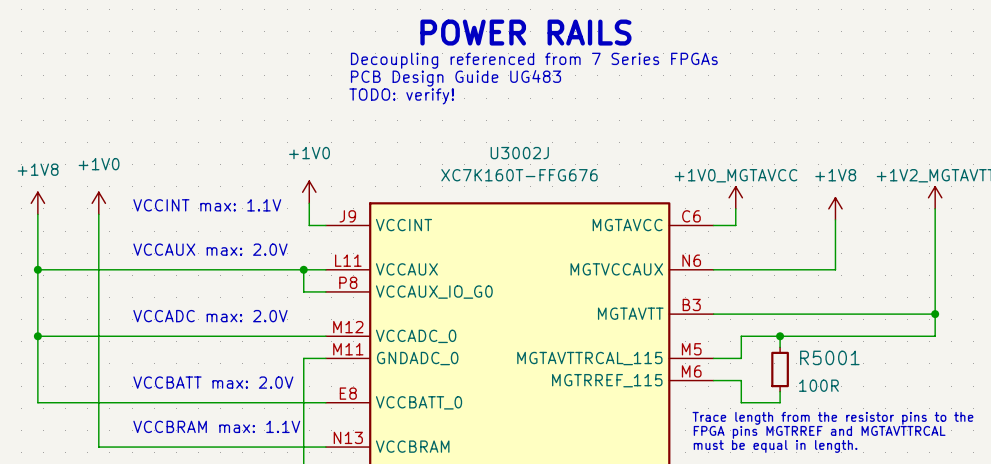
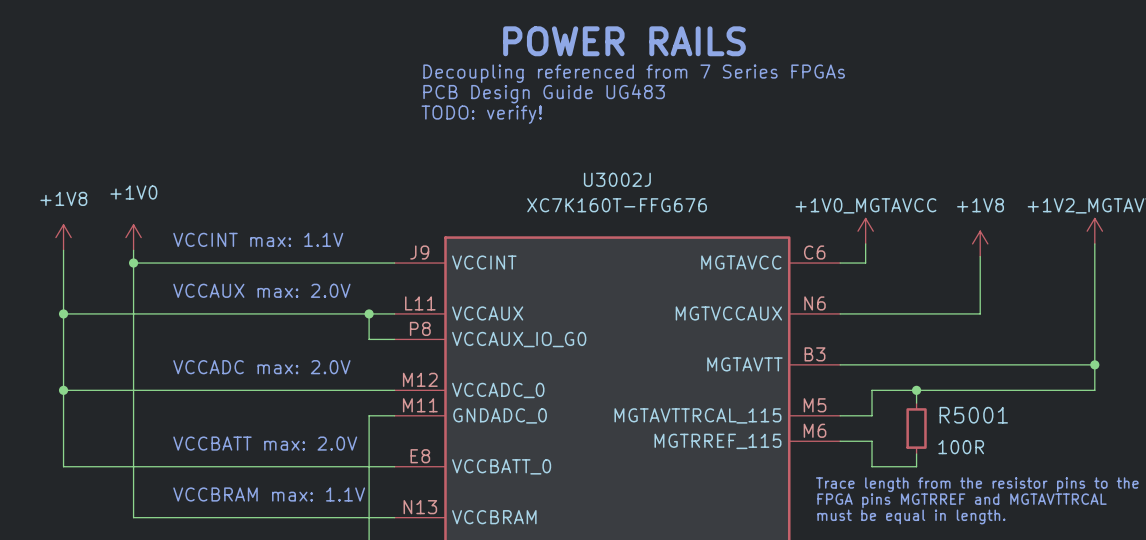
power symbol: +1V0 (309, 192) -> none
wire: (309, 203) (309, 225) -> (133, 263) (375, 263)
junction: none -> (133, 263)

